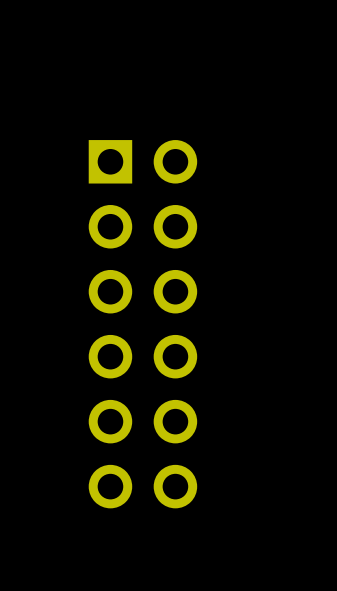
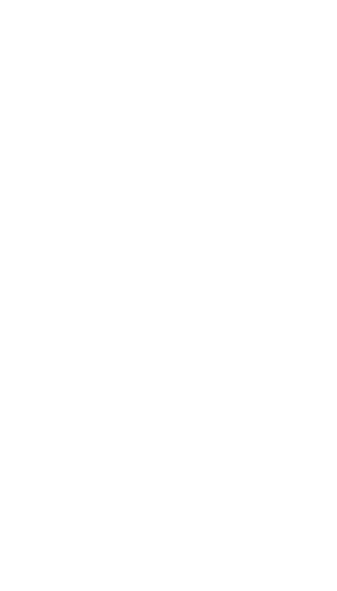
part: (142, 324) -> none

